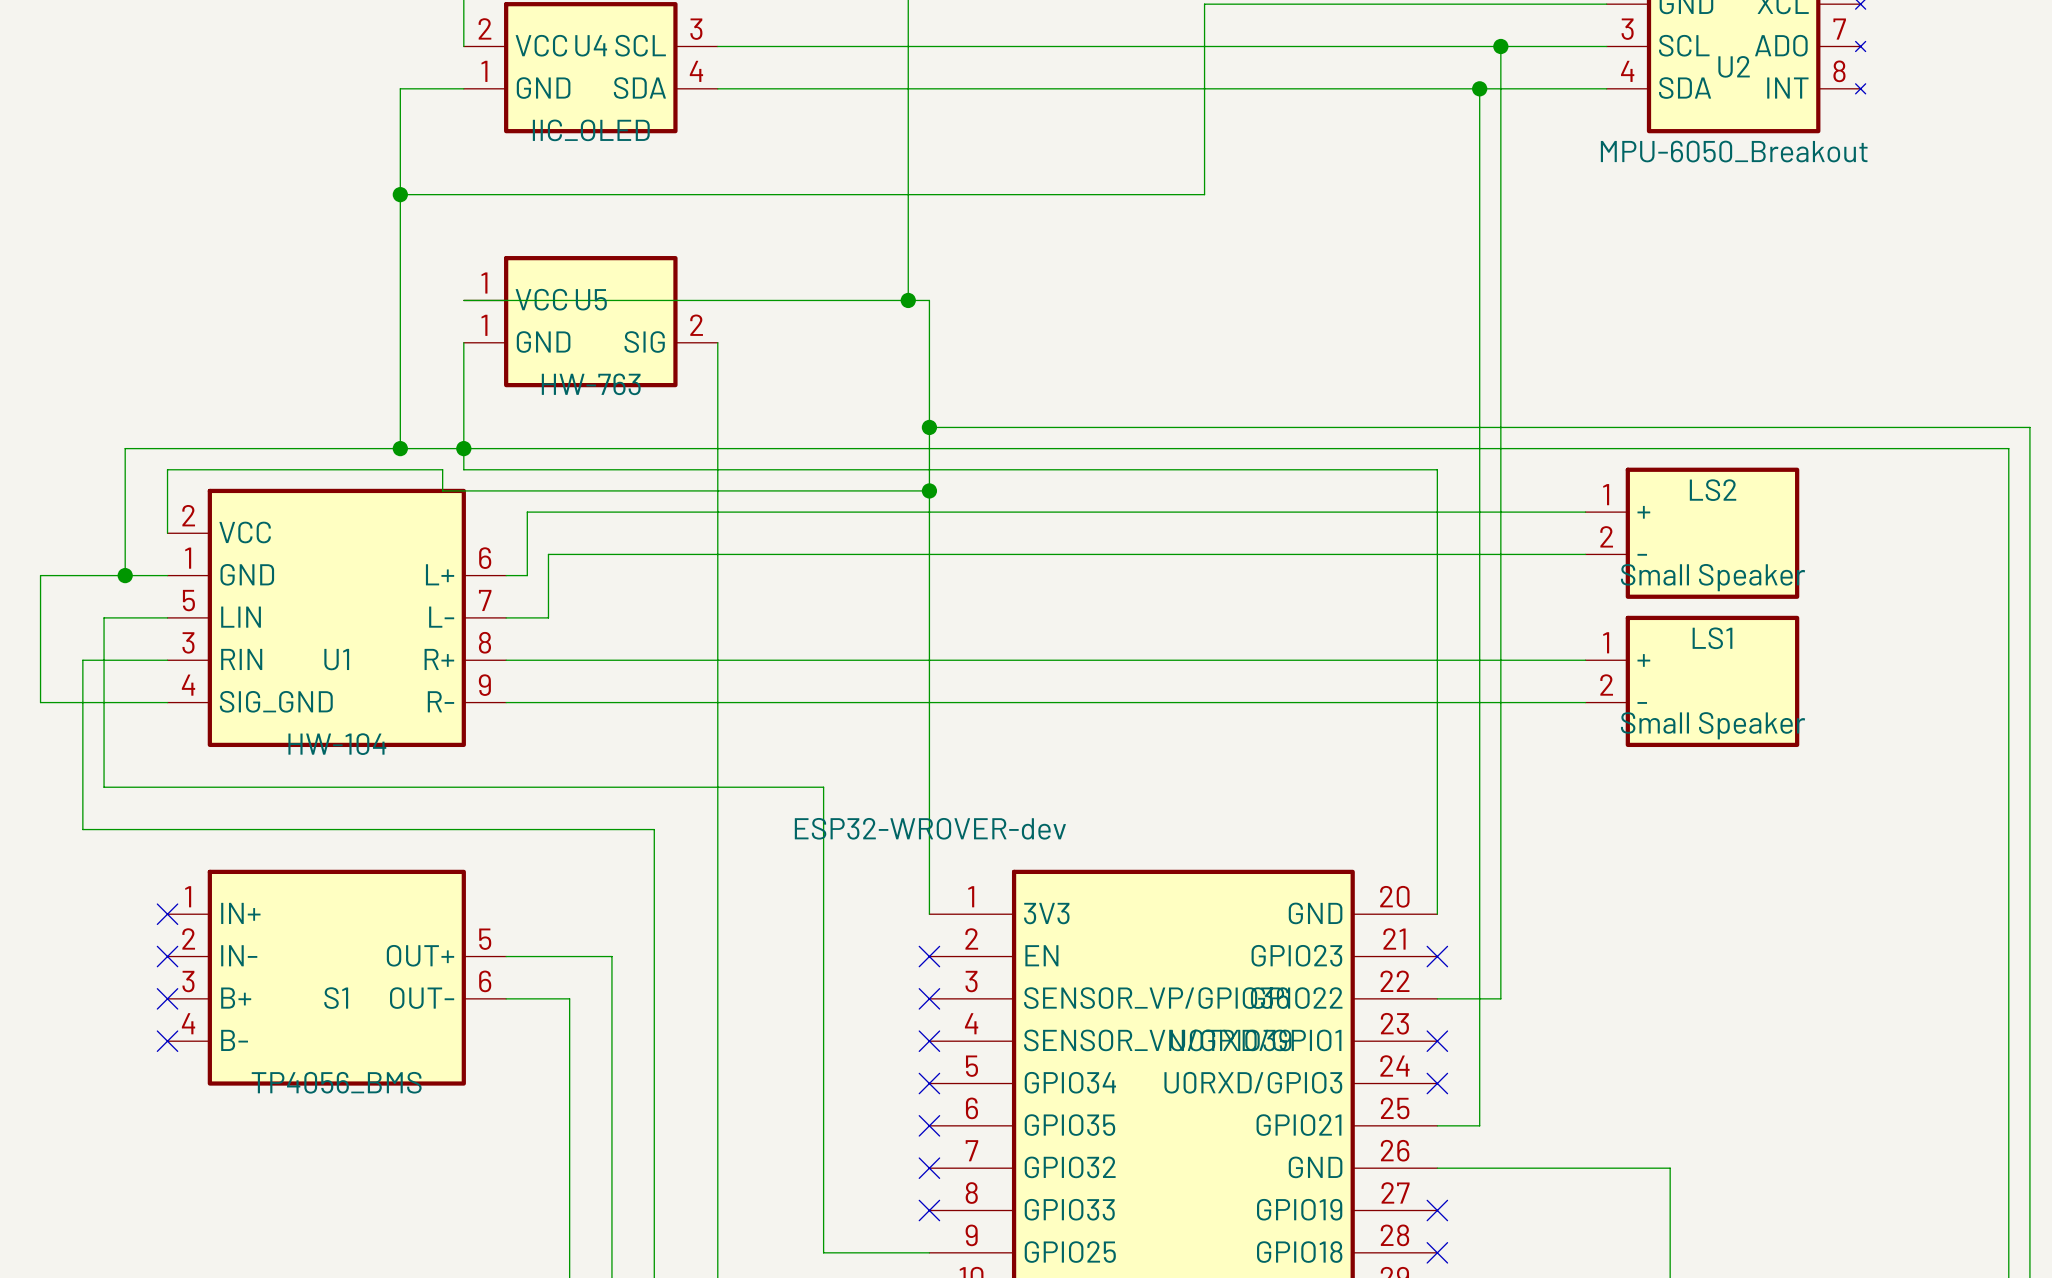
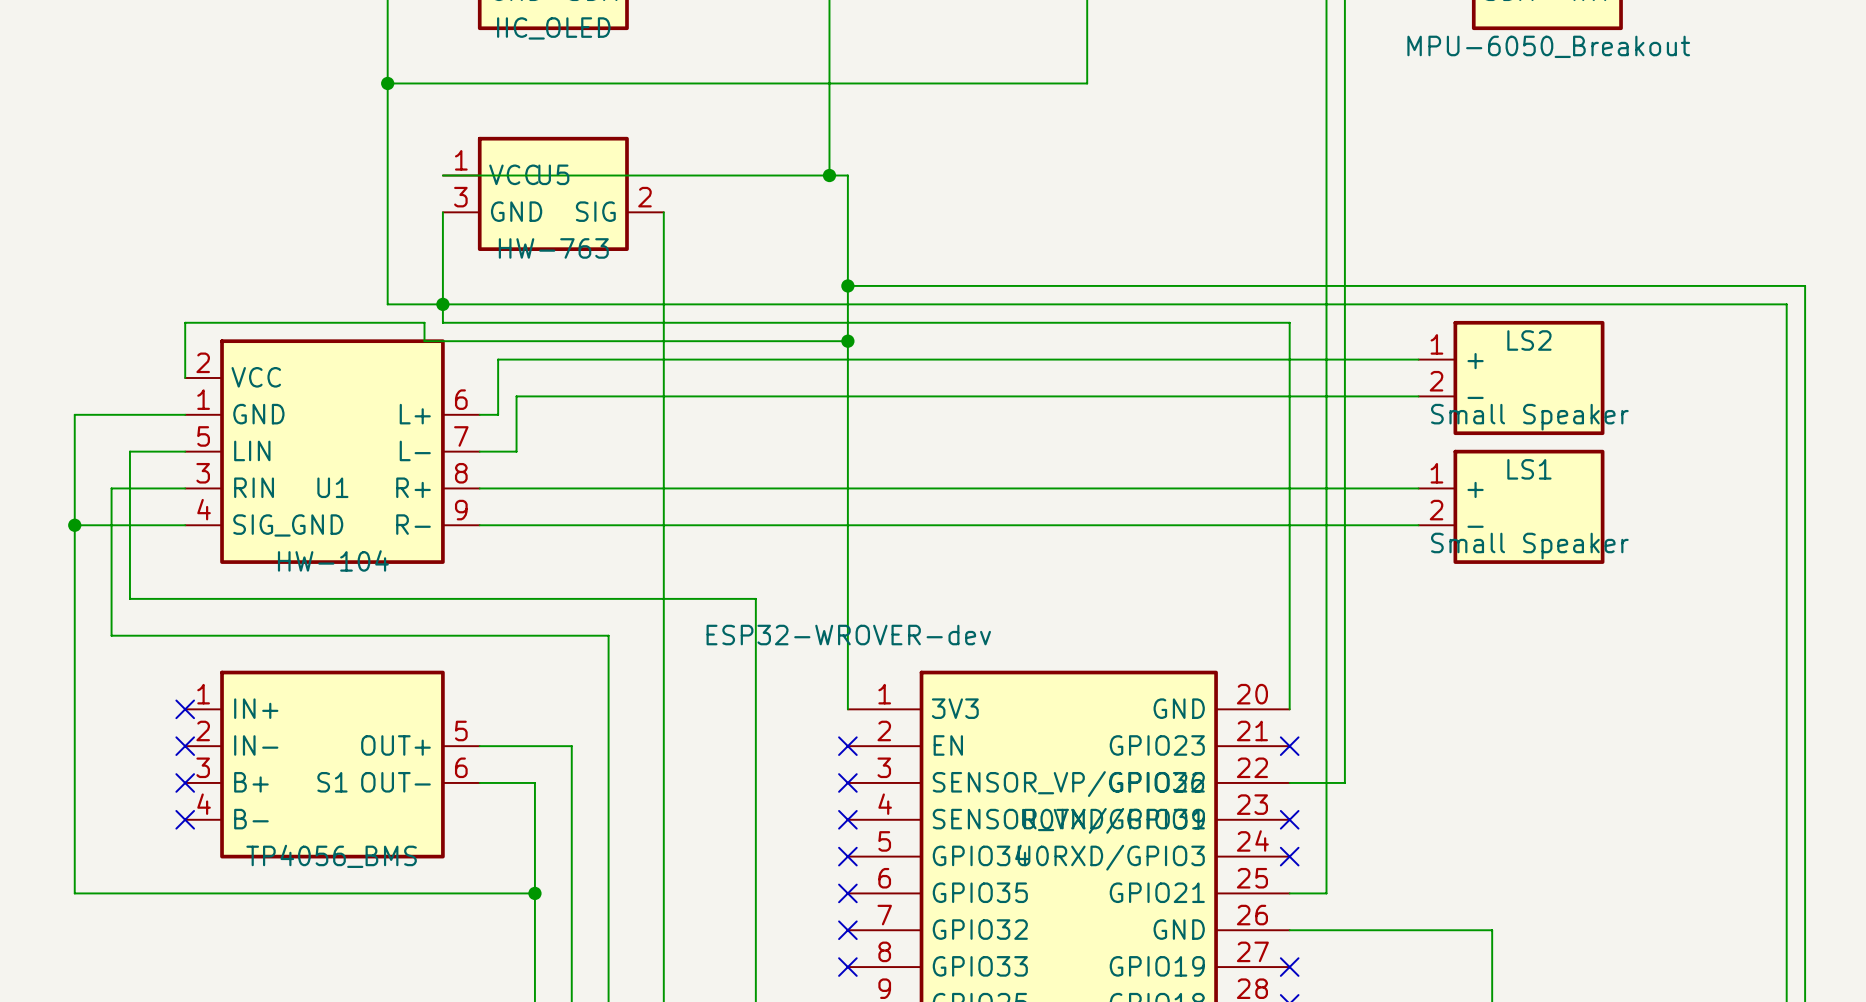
U5 pin number: 1 (484, 325) -> 3 (460, 197)
wire: (400, 448) (125, 448) (125, 575) -> none
junction: (400, 448) -> none
junction: (125, 575) -> none
wire: none -> (74, 525) (74, 893) (534, 893)
junction: none -> (74, 525)
junction: none -> (534, 893)

